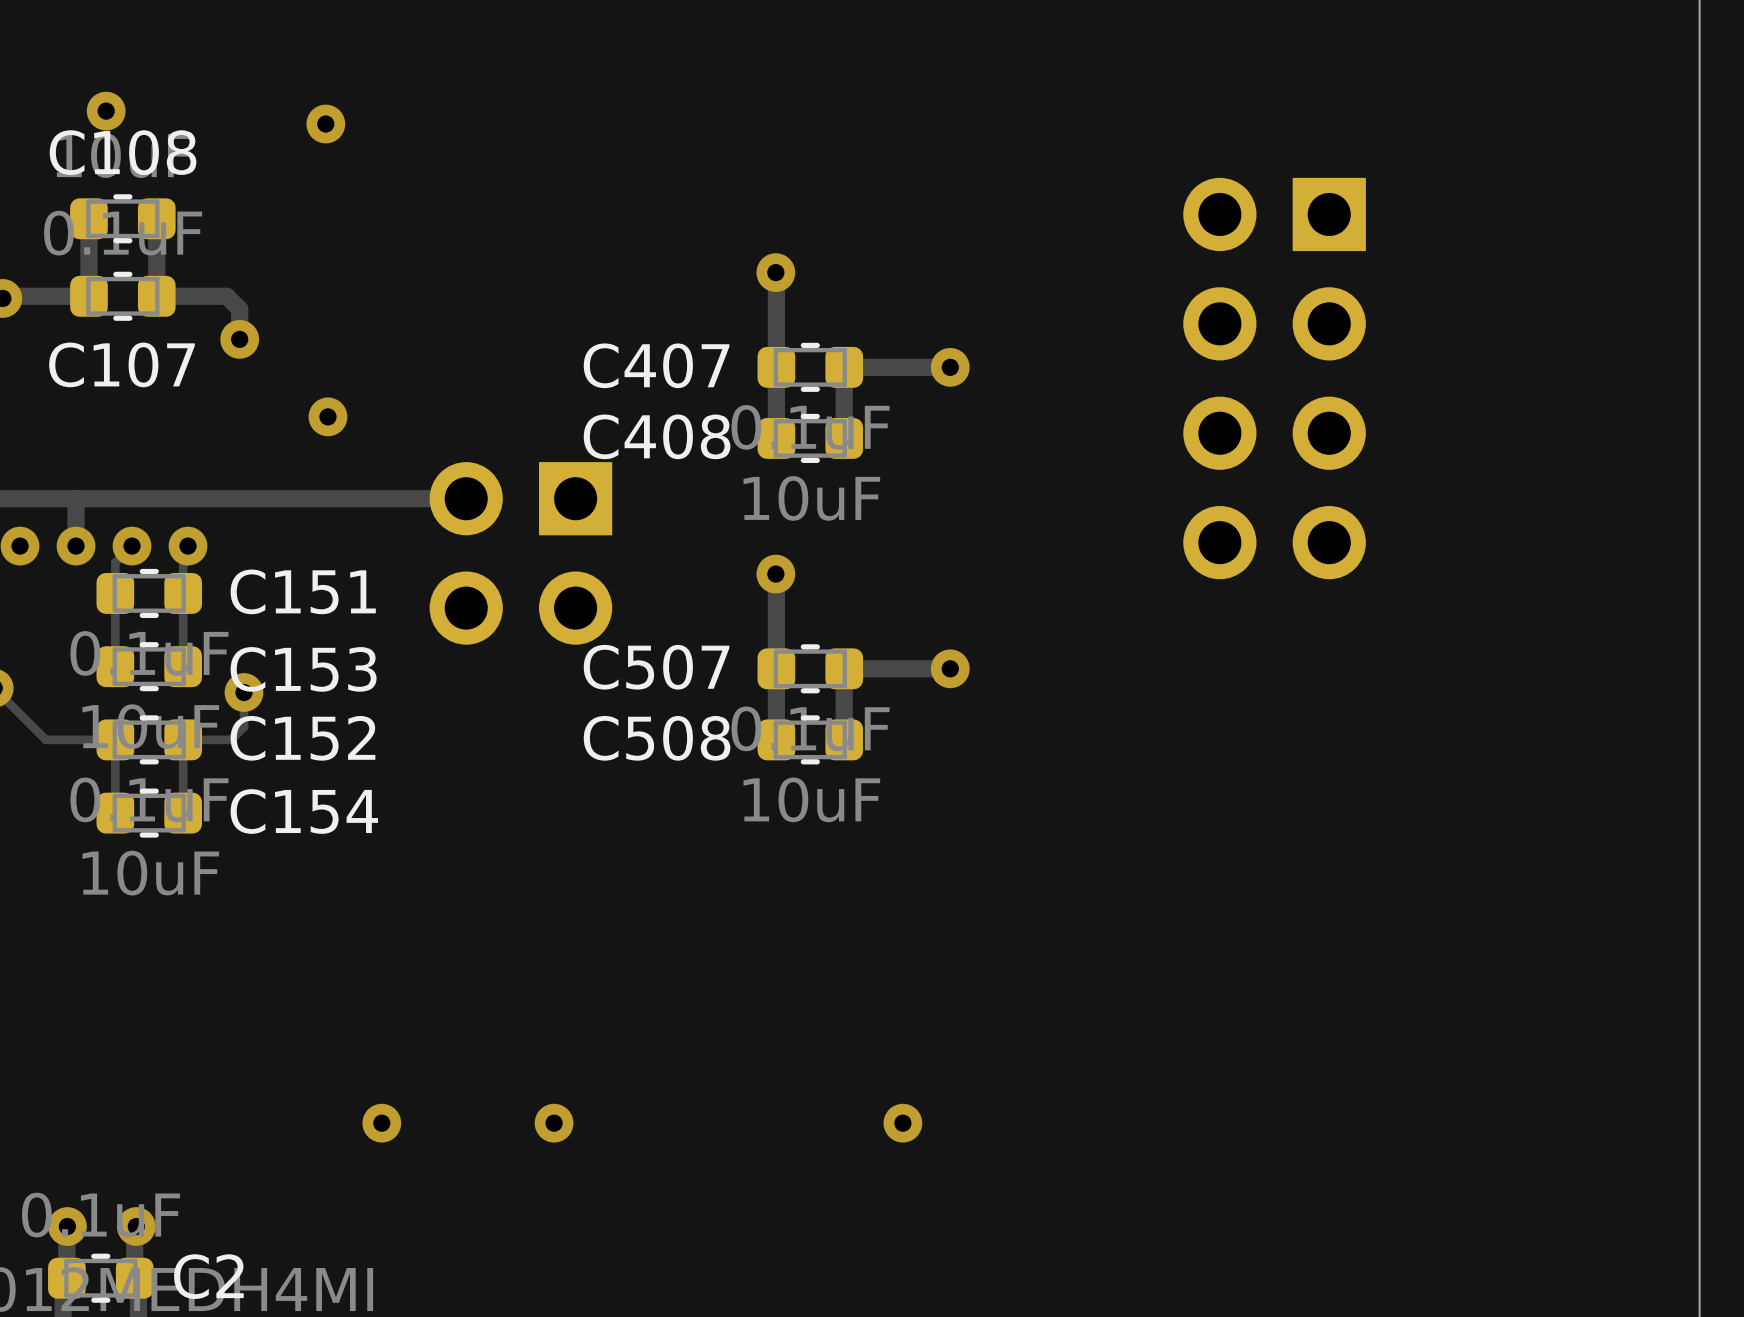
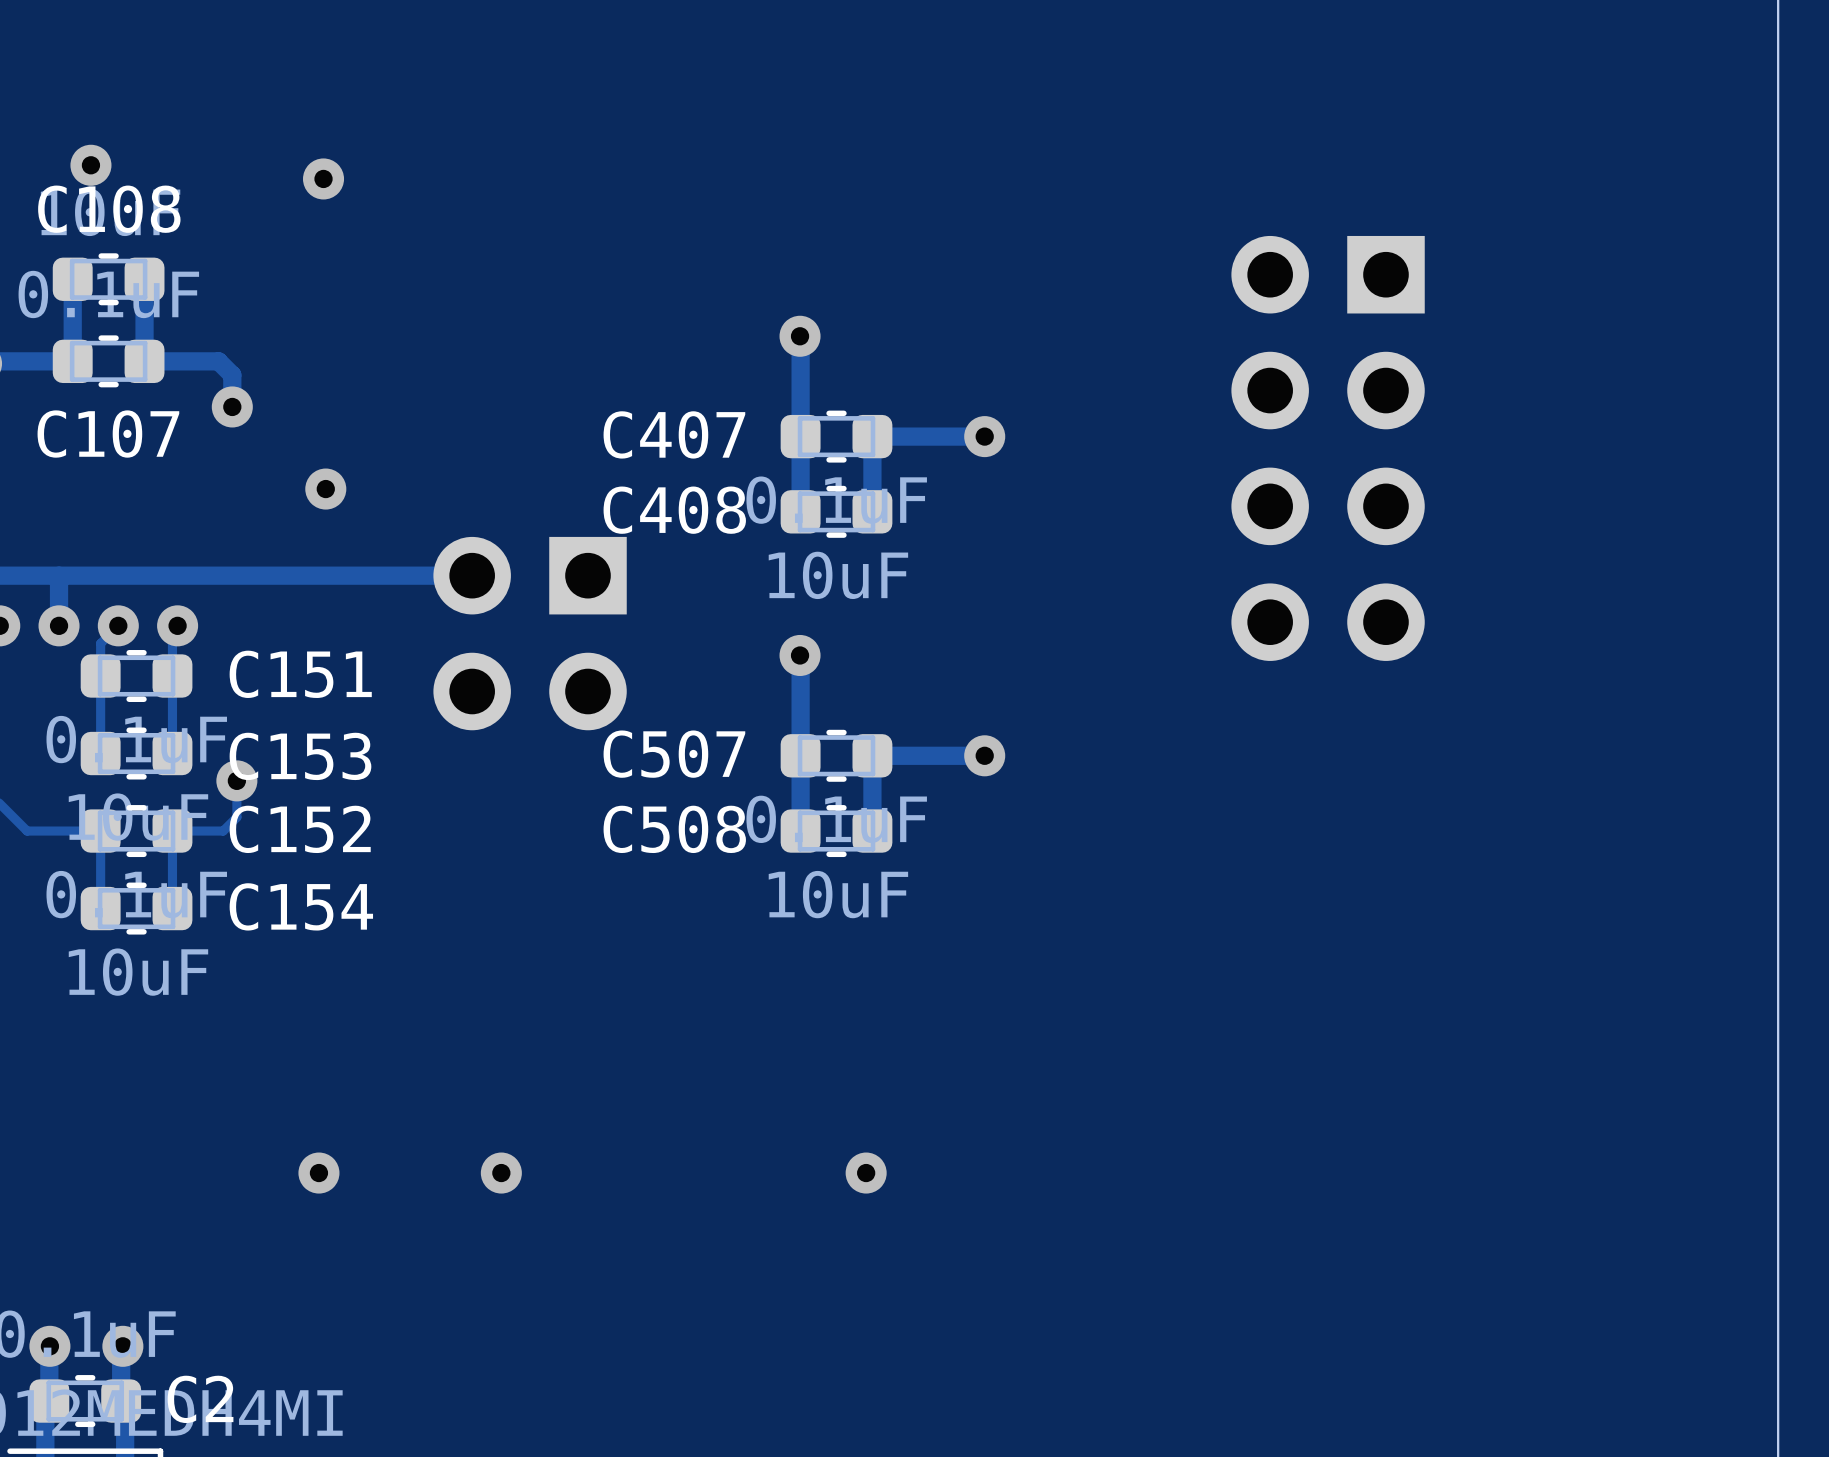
via: none -> (318, 1173)
via: none -> (501, 1173)
via: (381, 1123) -> none
via: (554, 1123) -> none
via position: (902, 1123) -> (866, 1173)

